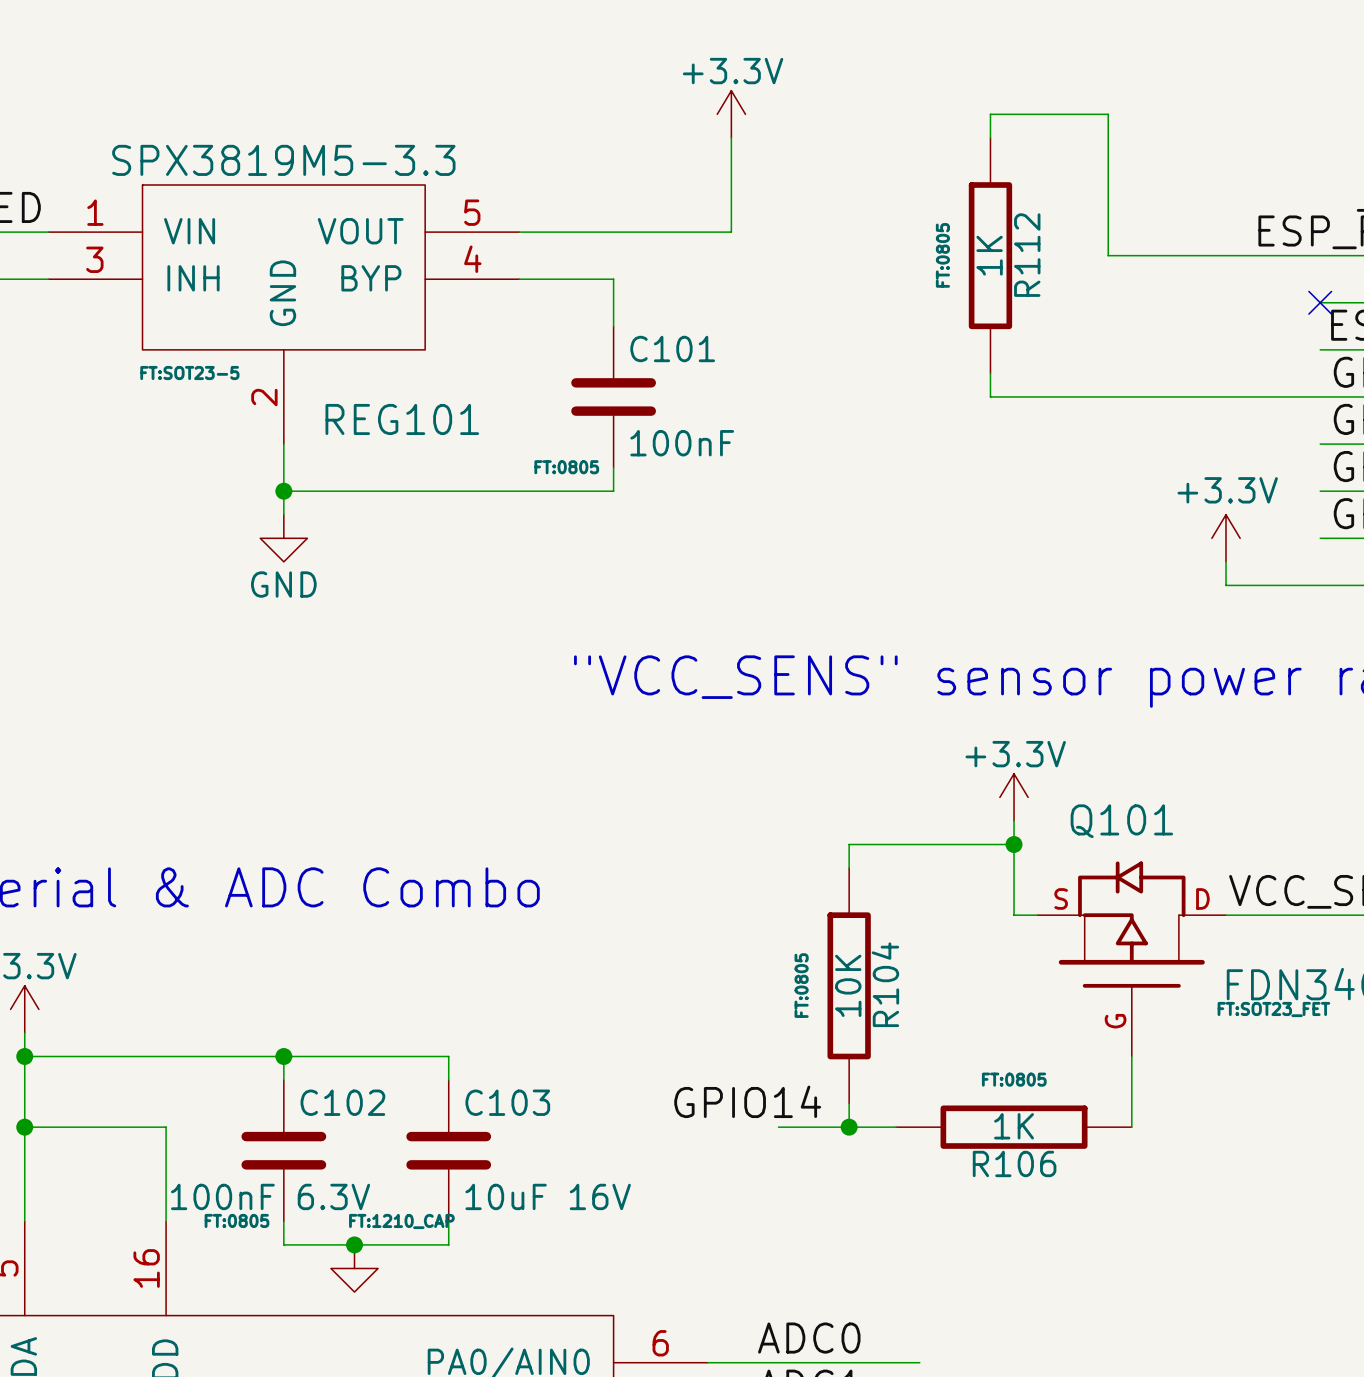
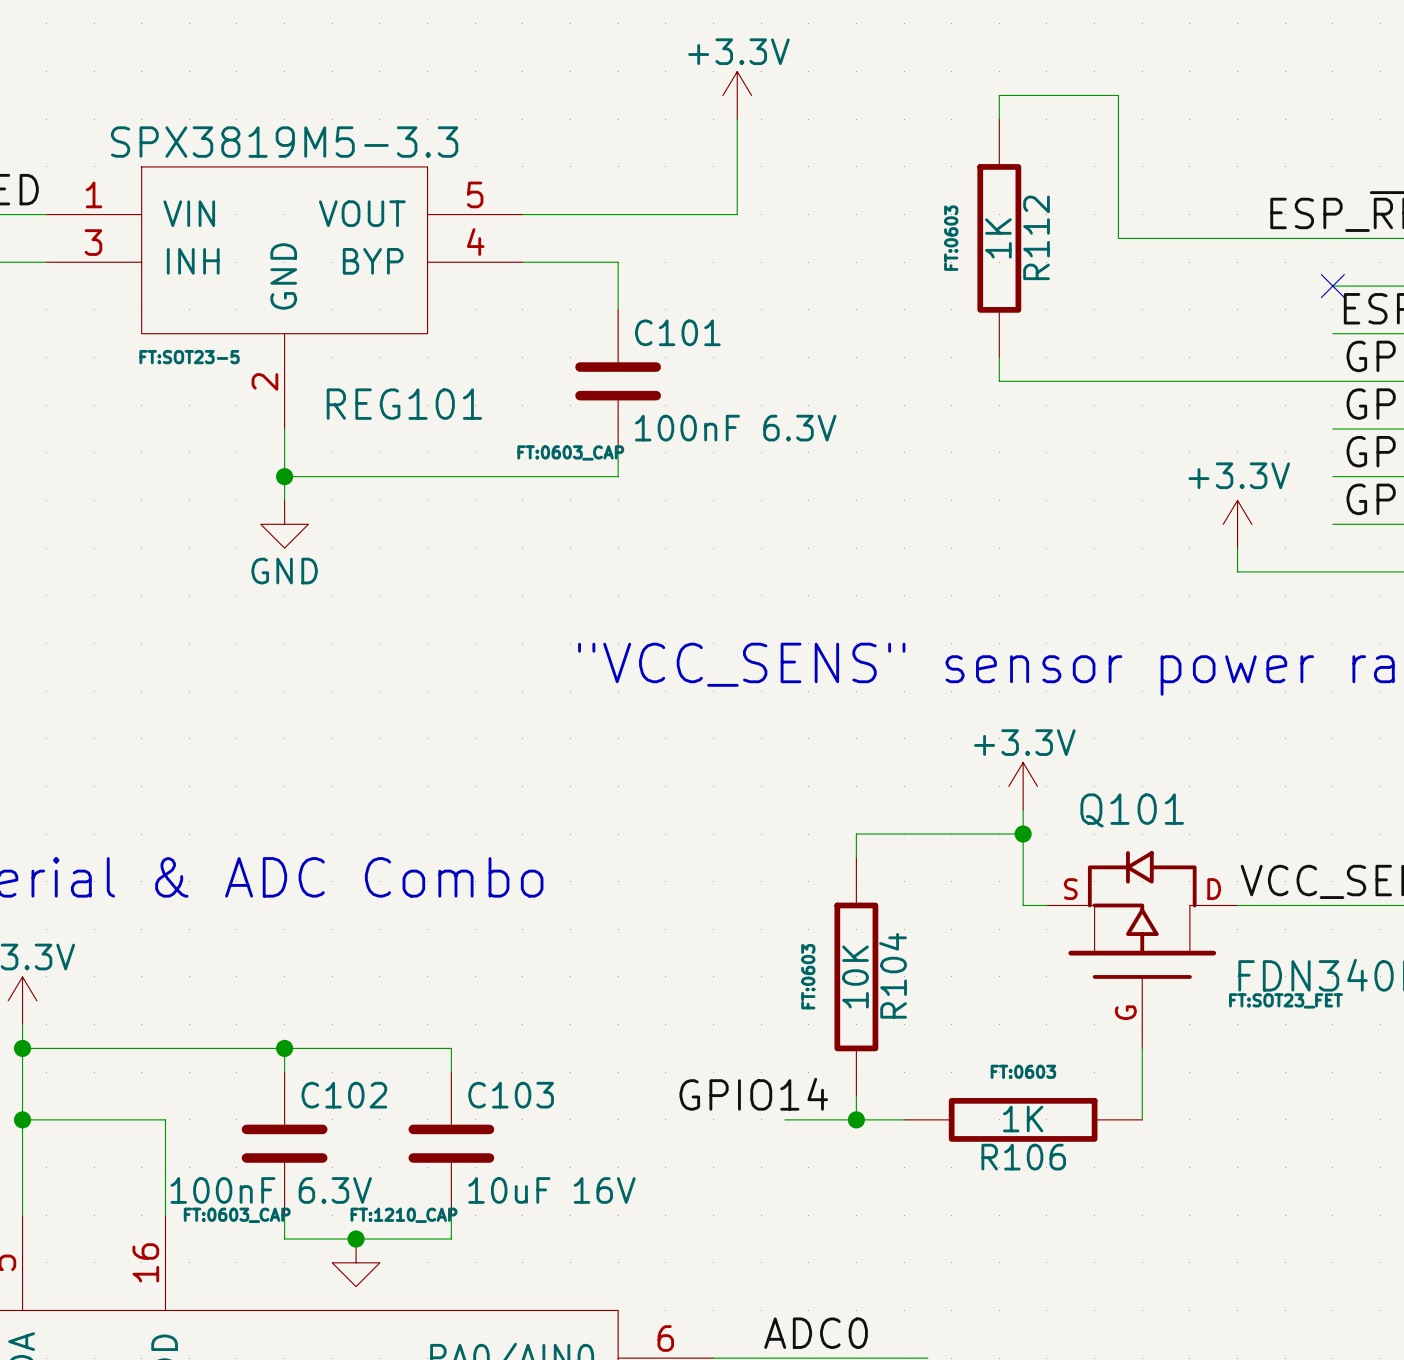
R112 text: FT:0805 (942, 255) -> FT:0603 (951, 238)
C101 value: 100nF (682, 443) -> 100nF 6.3V (735, 428)
C101 text: FT:0805 (566, 467) -> FT:0603_CAP (570, 452)
R104 text: FT:0805 (801, 985) -> FT:0603 (808, 976)
R106 text: FT:0805 (1014, 1079) -> FT:0603 (1023, 1071)
C102 text: FT:0805 (237, 1220) -> FT:0603_CAP (237, 1215)

